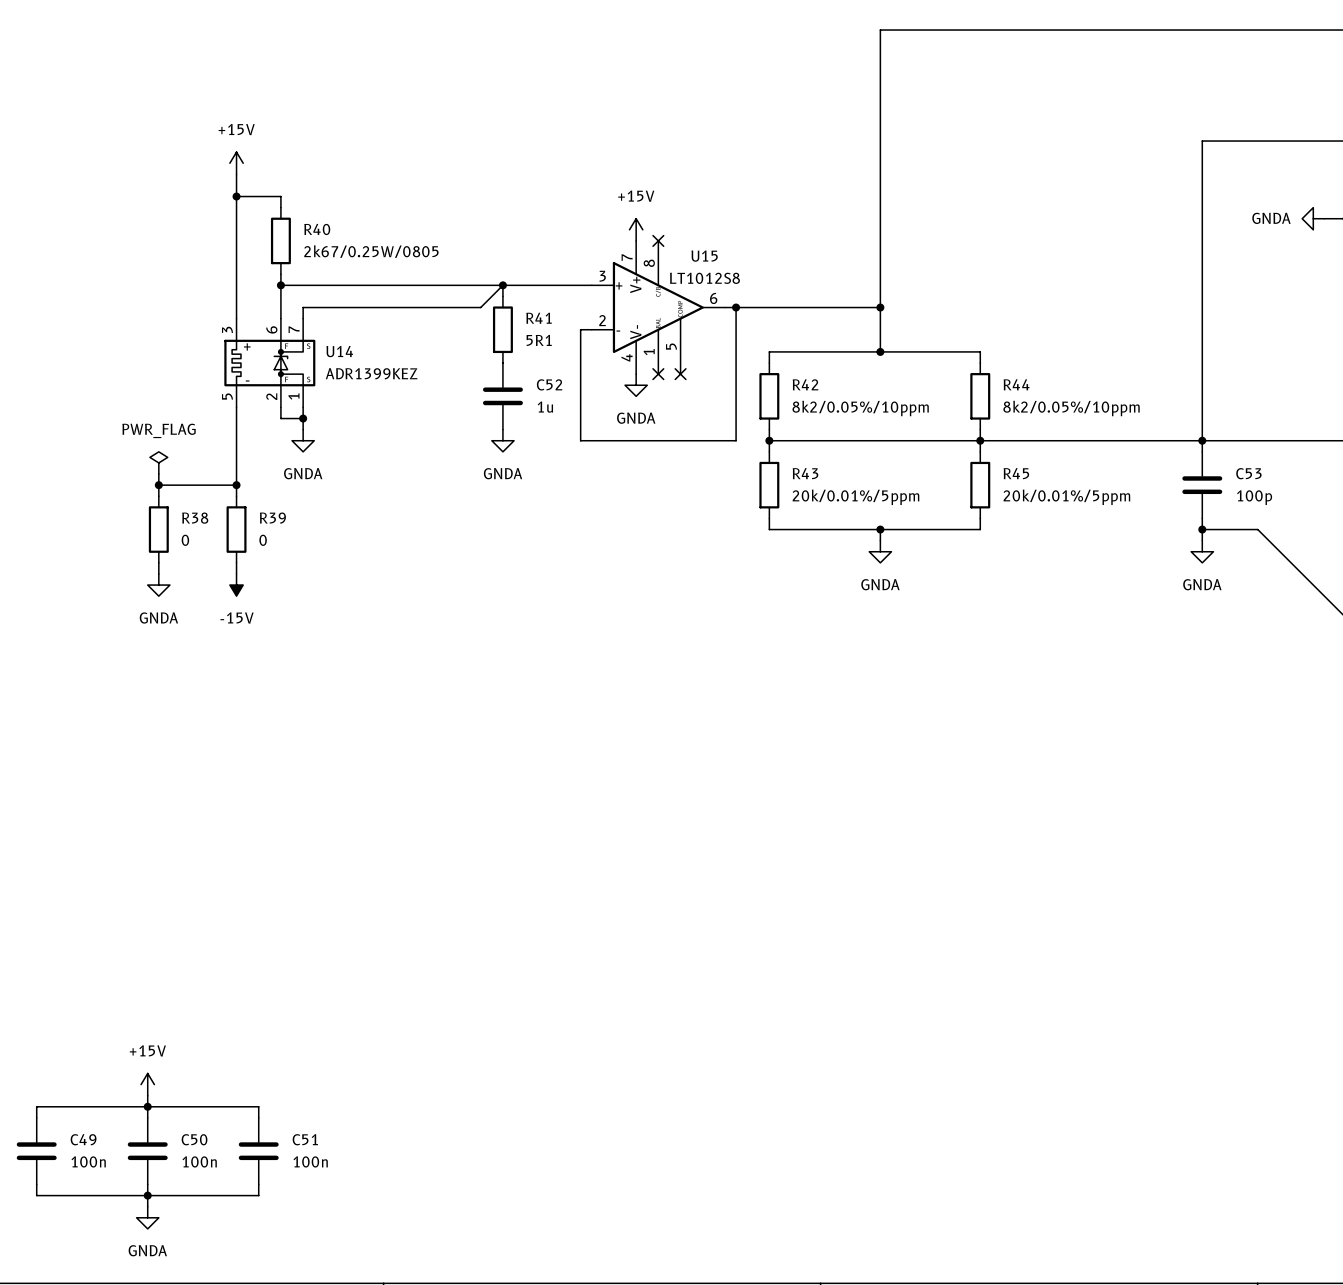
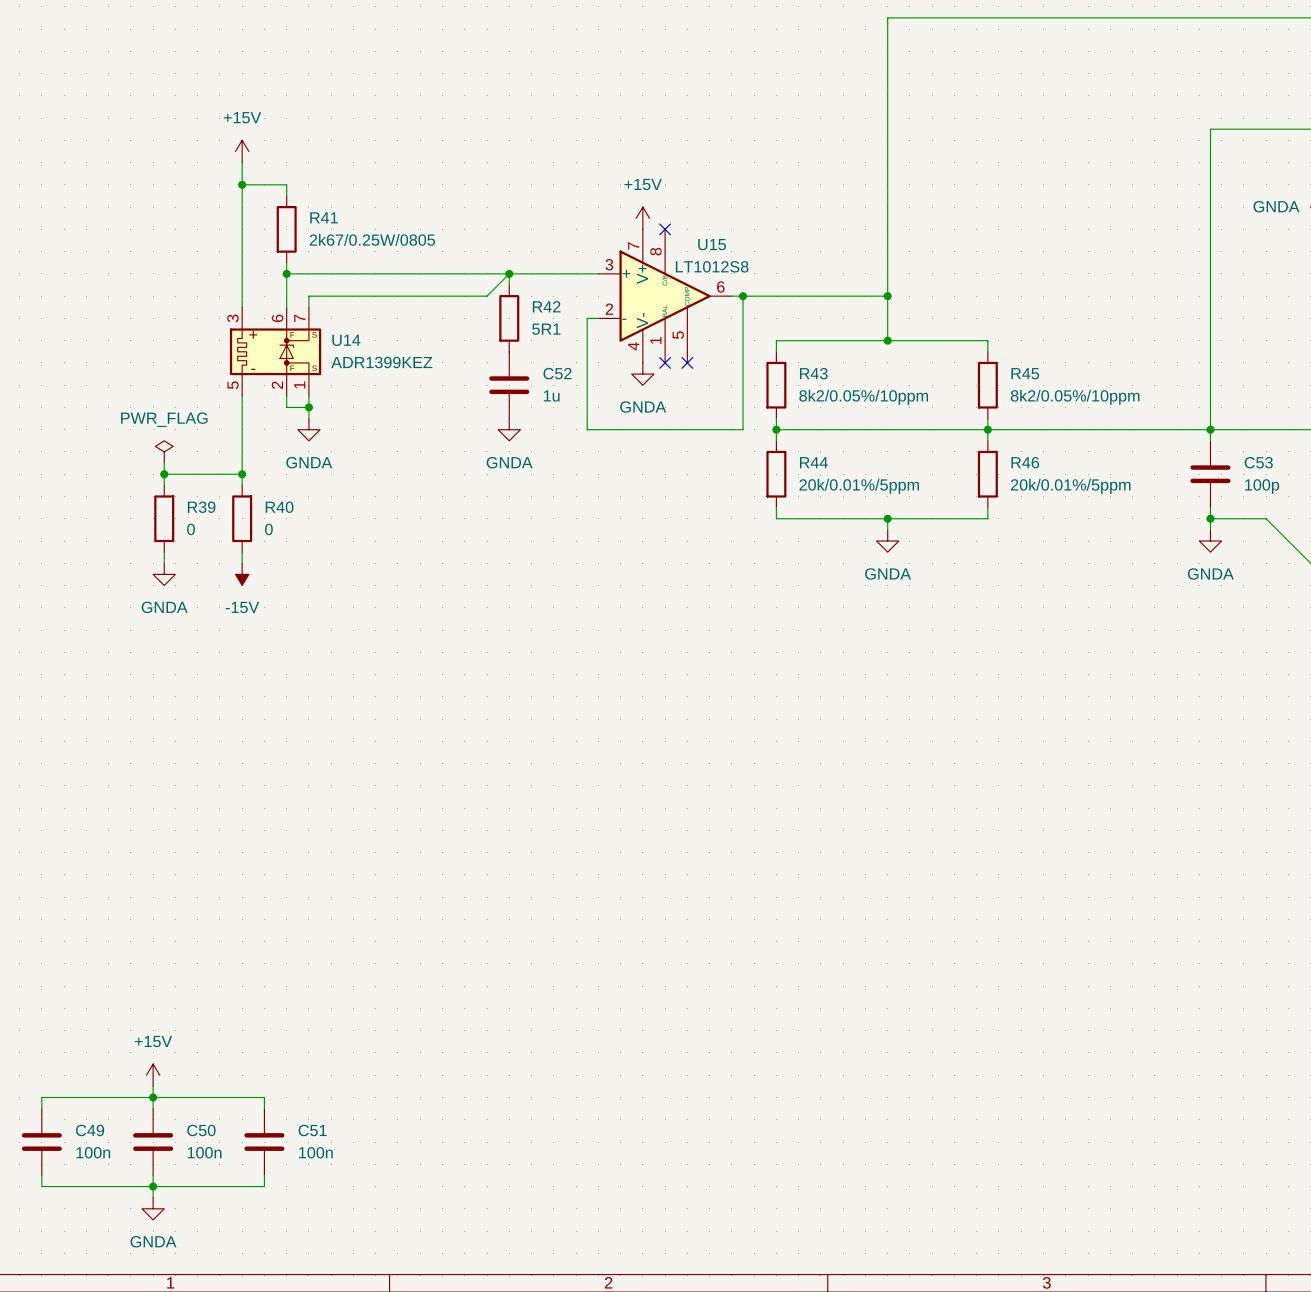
R40 name: R40 (317, 229) -> R41 (324, 217)
R41 name: R41 (539, 318) -> R42 (546, 306)
R42 name: R42 (805, 384) -> R43 (813, 373)
R44 name: R44 (1016, 384) -> R45 (1025, 373)
R43 name: R43 (805, 473) -> R44 (813, 462)
R45 name: R45 (1016, 473) -> R46 (1025, 462)
R38 name: R38 (195, 518) -> R39 (201, 507)
R39 name: R39 (272, 518) -> R40 (279, 507)

